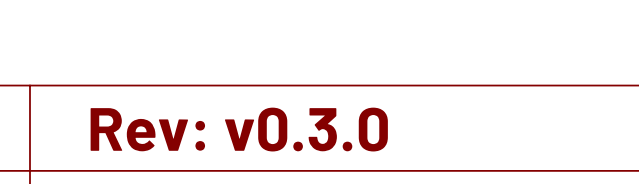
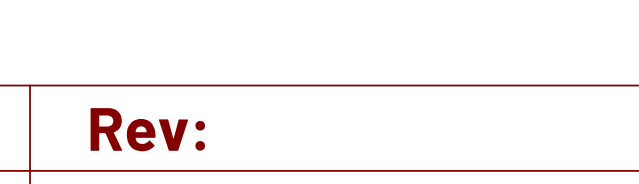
title block: Rev: v0.3.0 (239, 129) -> Rev: (147, 129)

